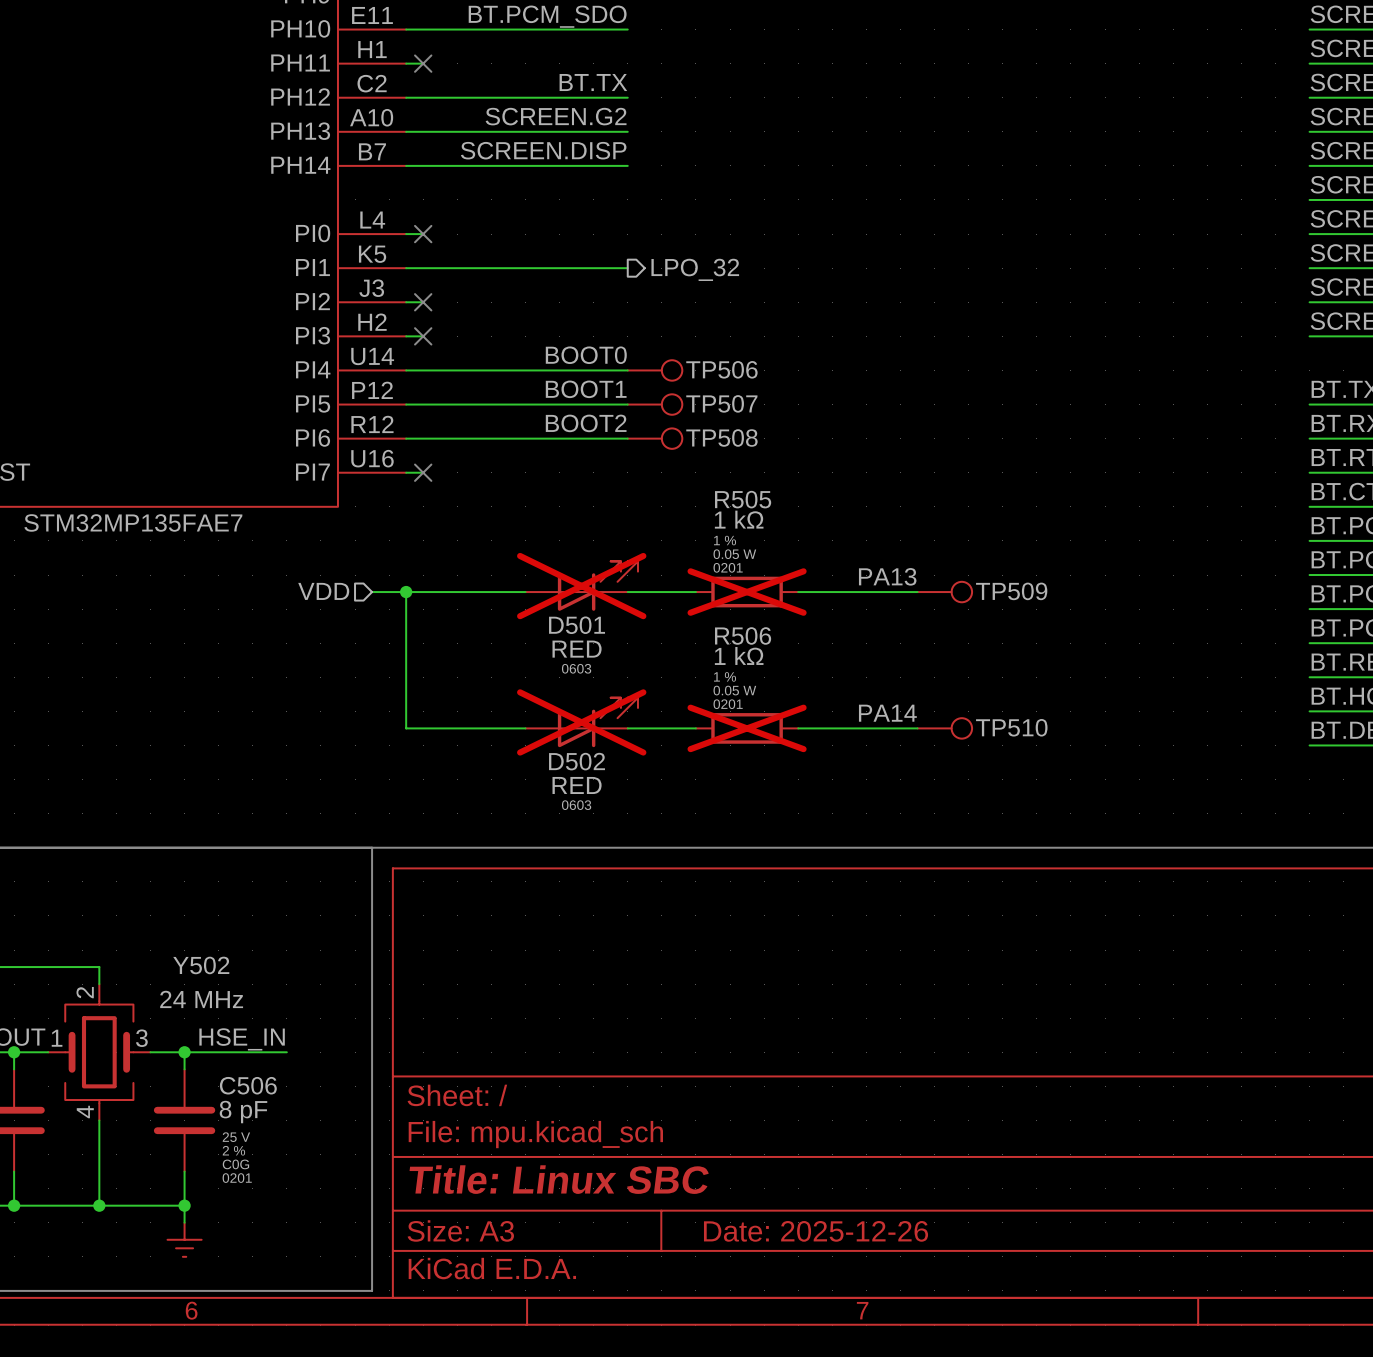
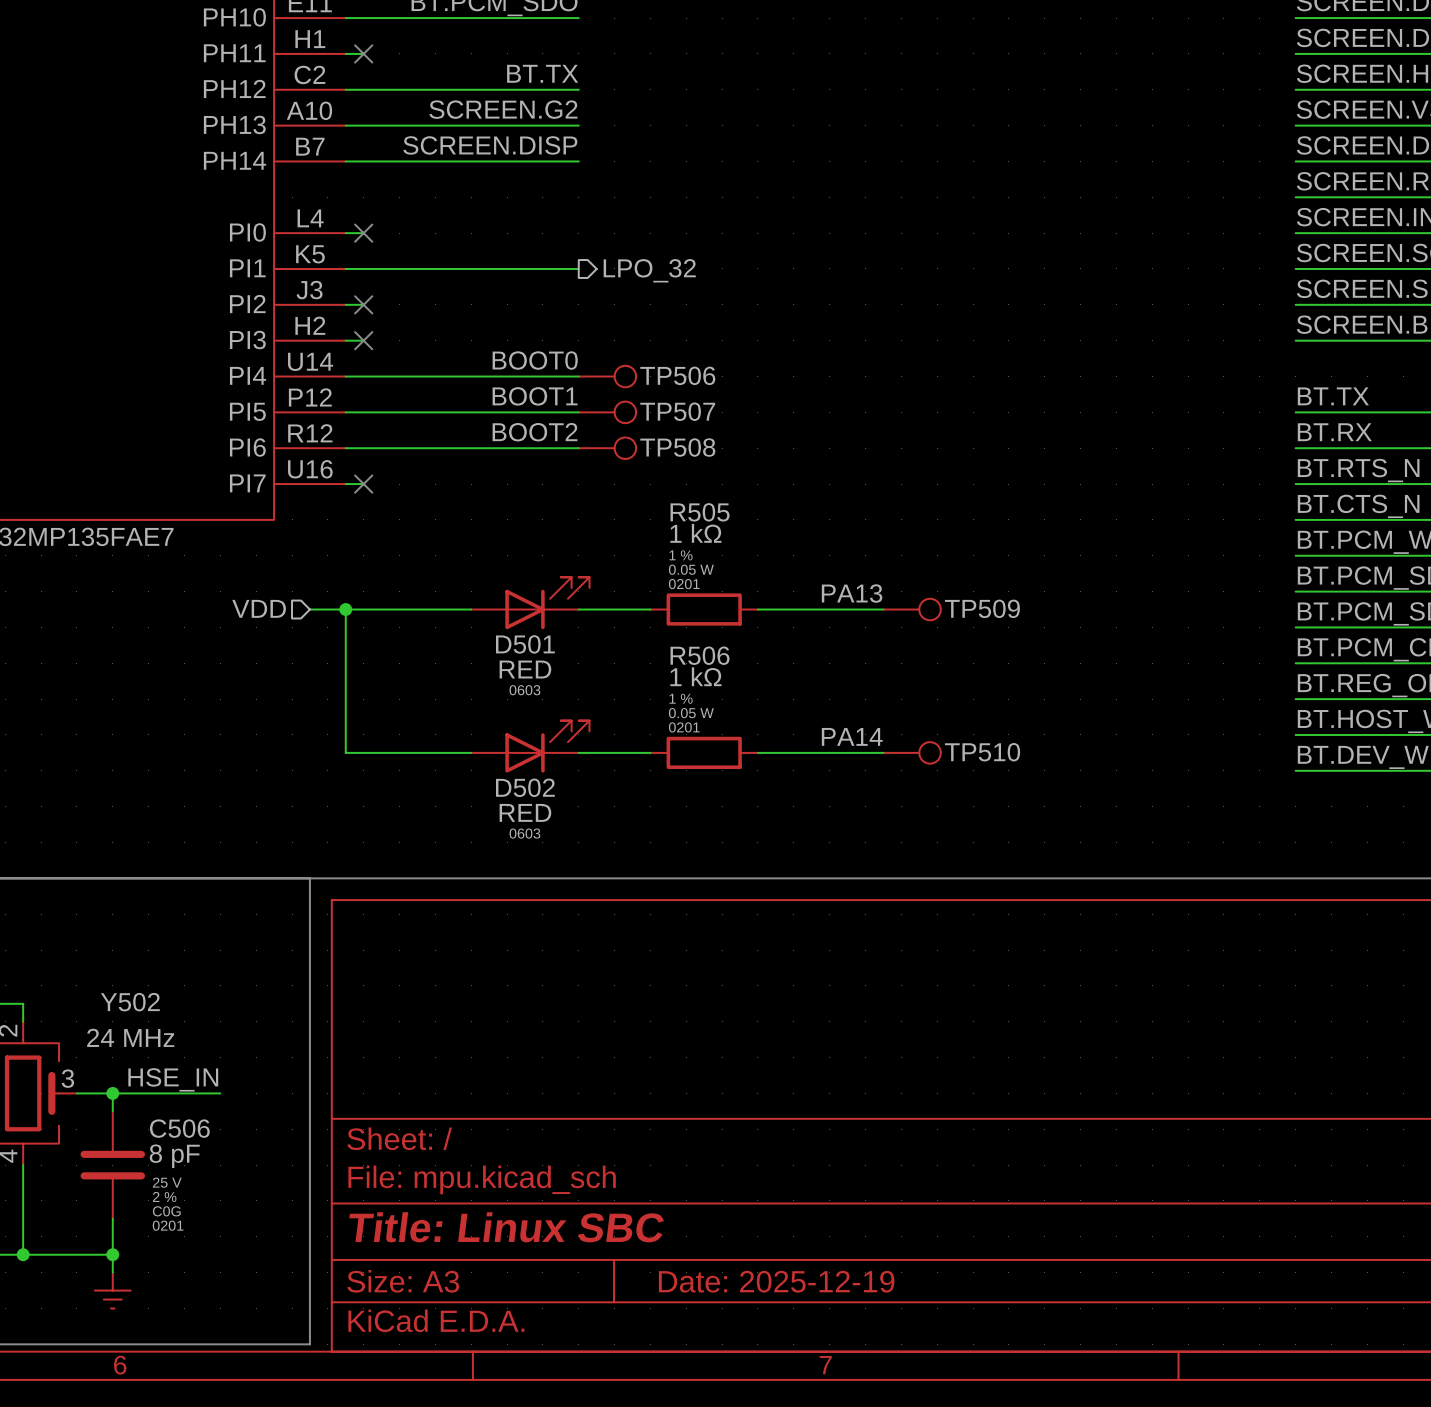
D501 do-not-place cross: (581, 586) -> none
R505 do-not-place cross: (747, 592) -> none
D502 do-not-place cross: (581, 722) -> none
R506 do-not-place cross: (747, 728) -> none
title block: Date: 2025-12-26 (816, 1231) -> Date: 2025-12-19 (776, 1281)

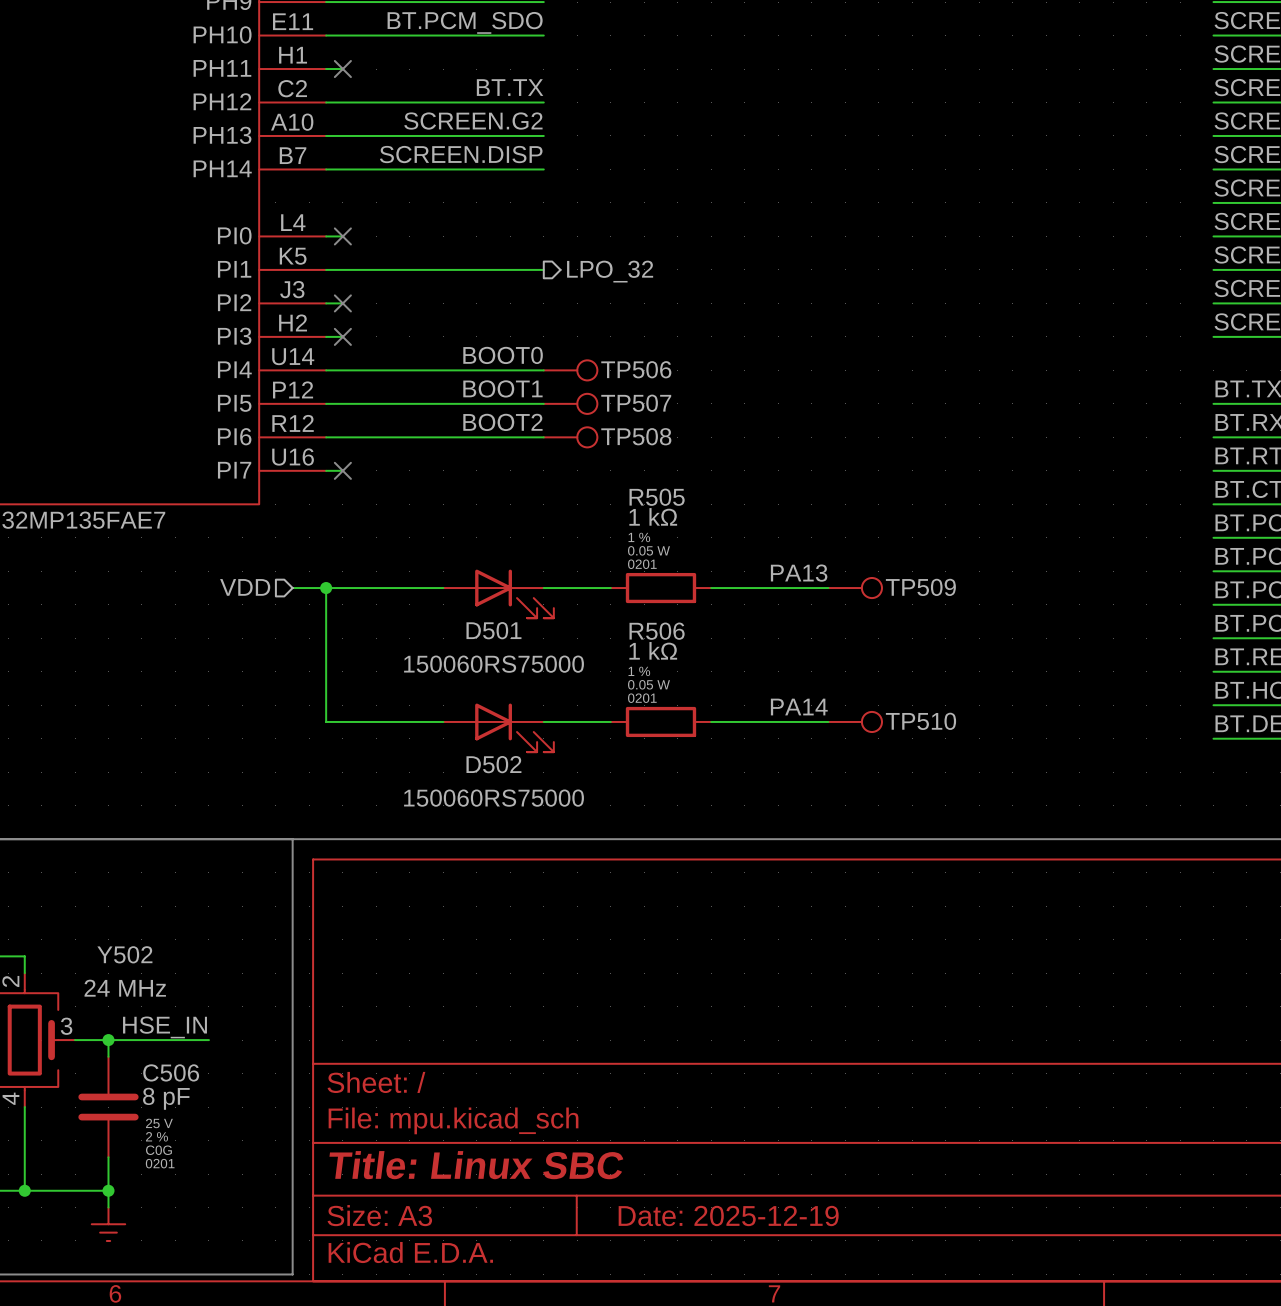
D501 flip: as is (547, 603) -> up-down (514, 593)
D501 value: RED (525, 669) -> 150060RS75000 (494, 664)
D501 text: 0603 (524, 690) -> none
D502 flip: as is (547, 746) -> up-down (514, 727)
D502 value: RED (525, 812) -> 150060RS75000 (494, 798)
D502 text: 0603 (524, 833) -> none

